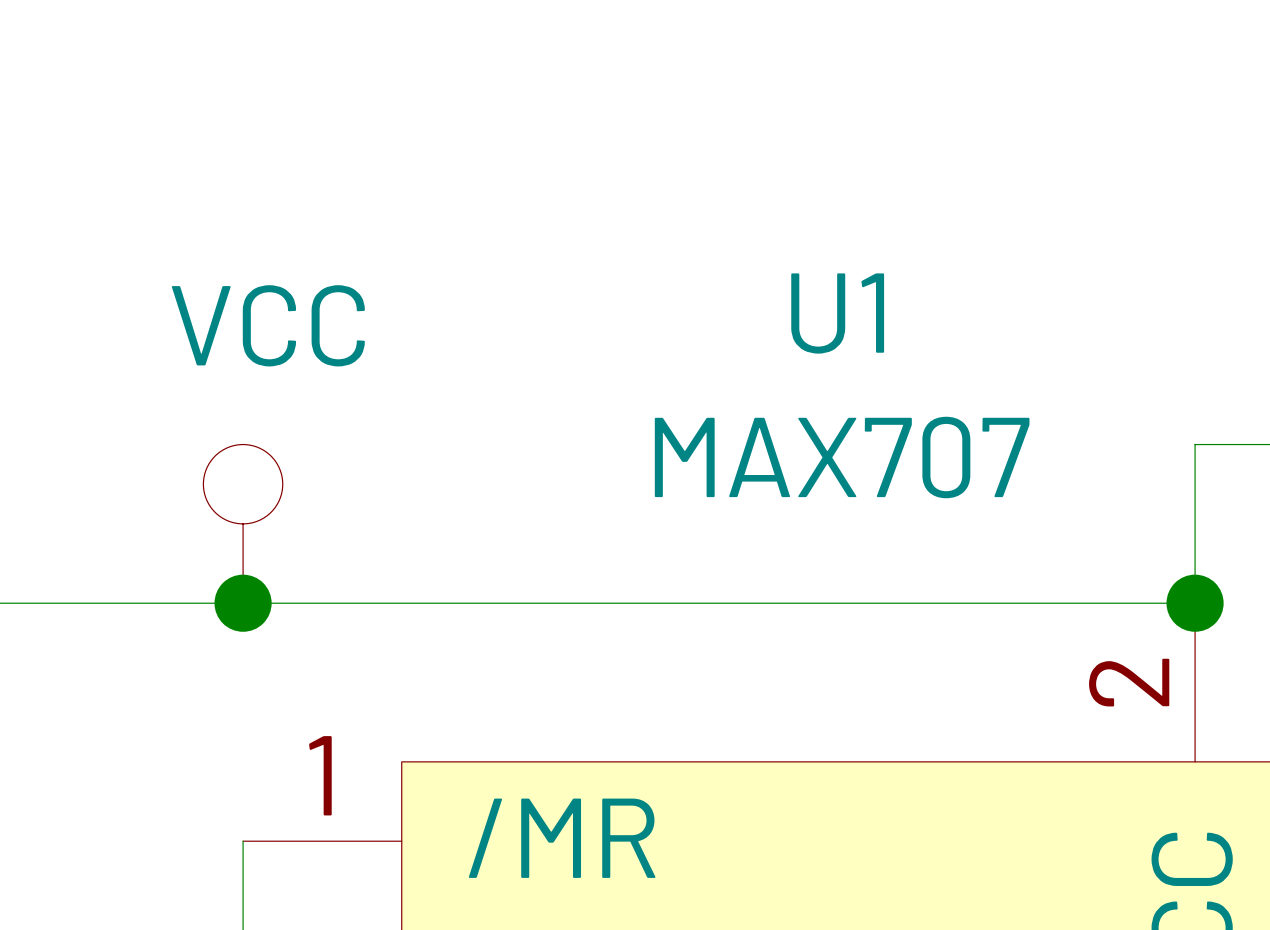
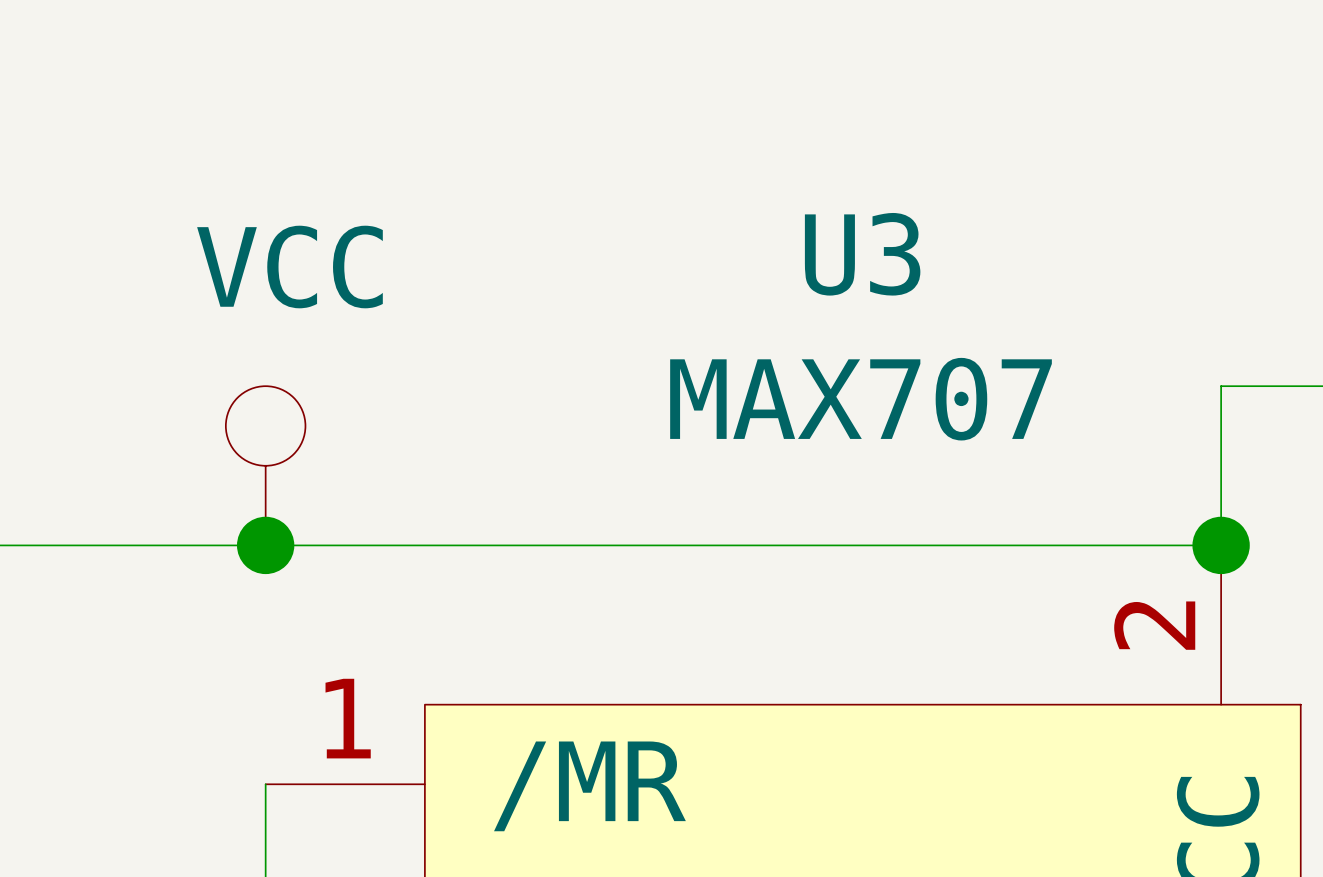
U1 name: U1 (837, 313) -> U3 (862, 254)

